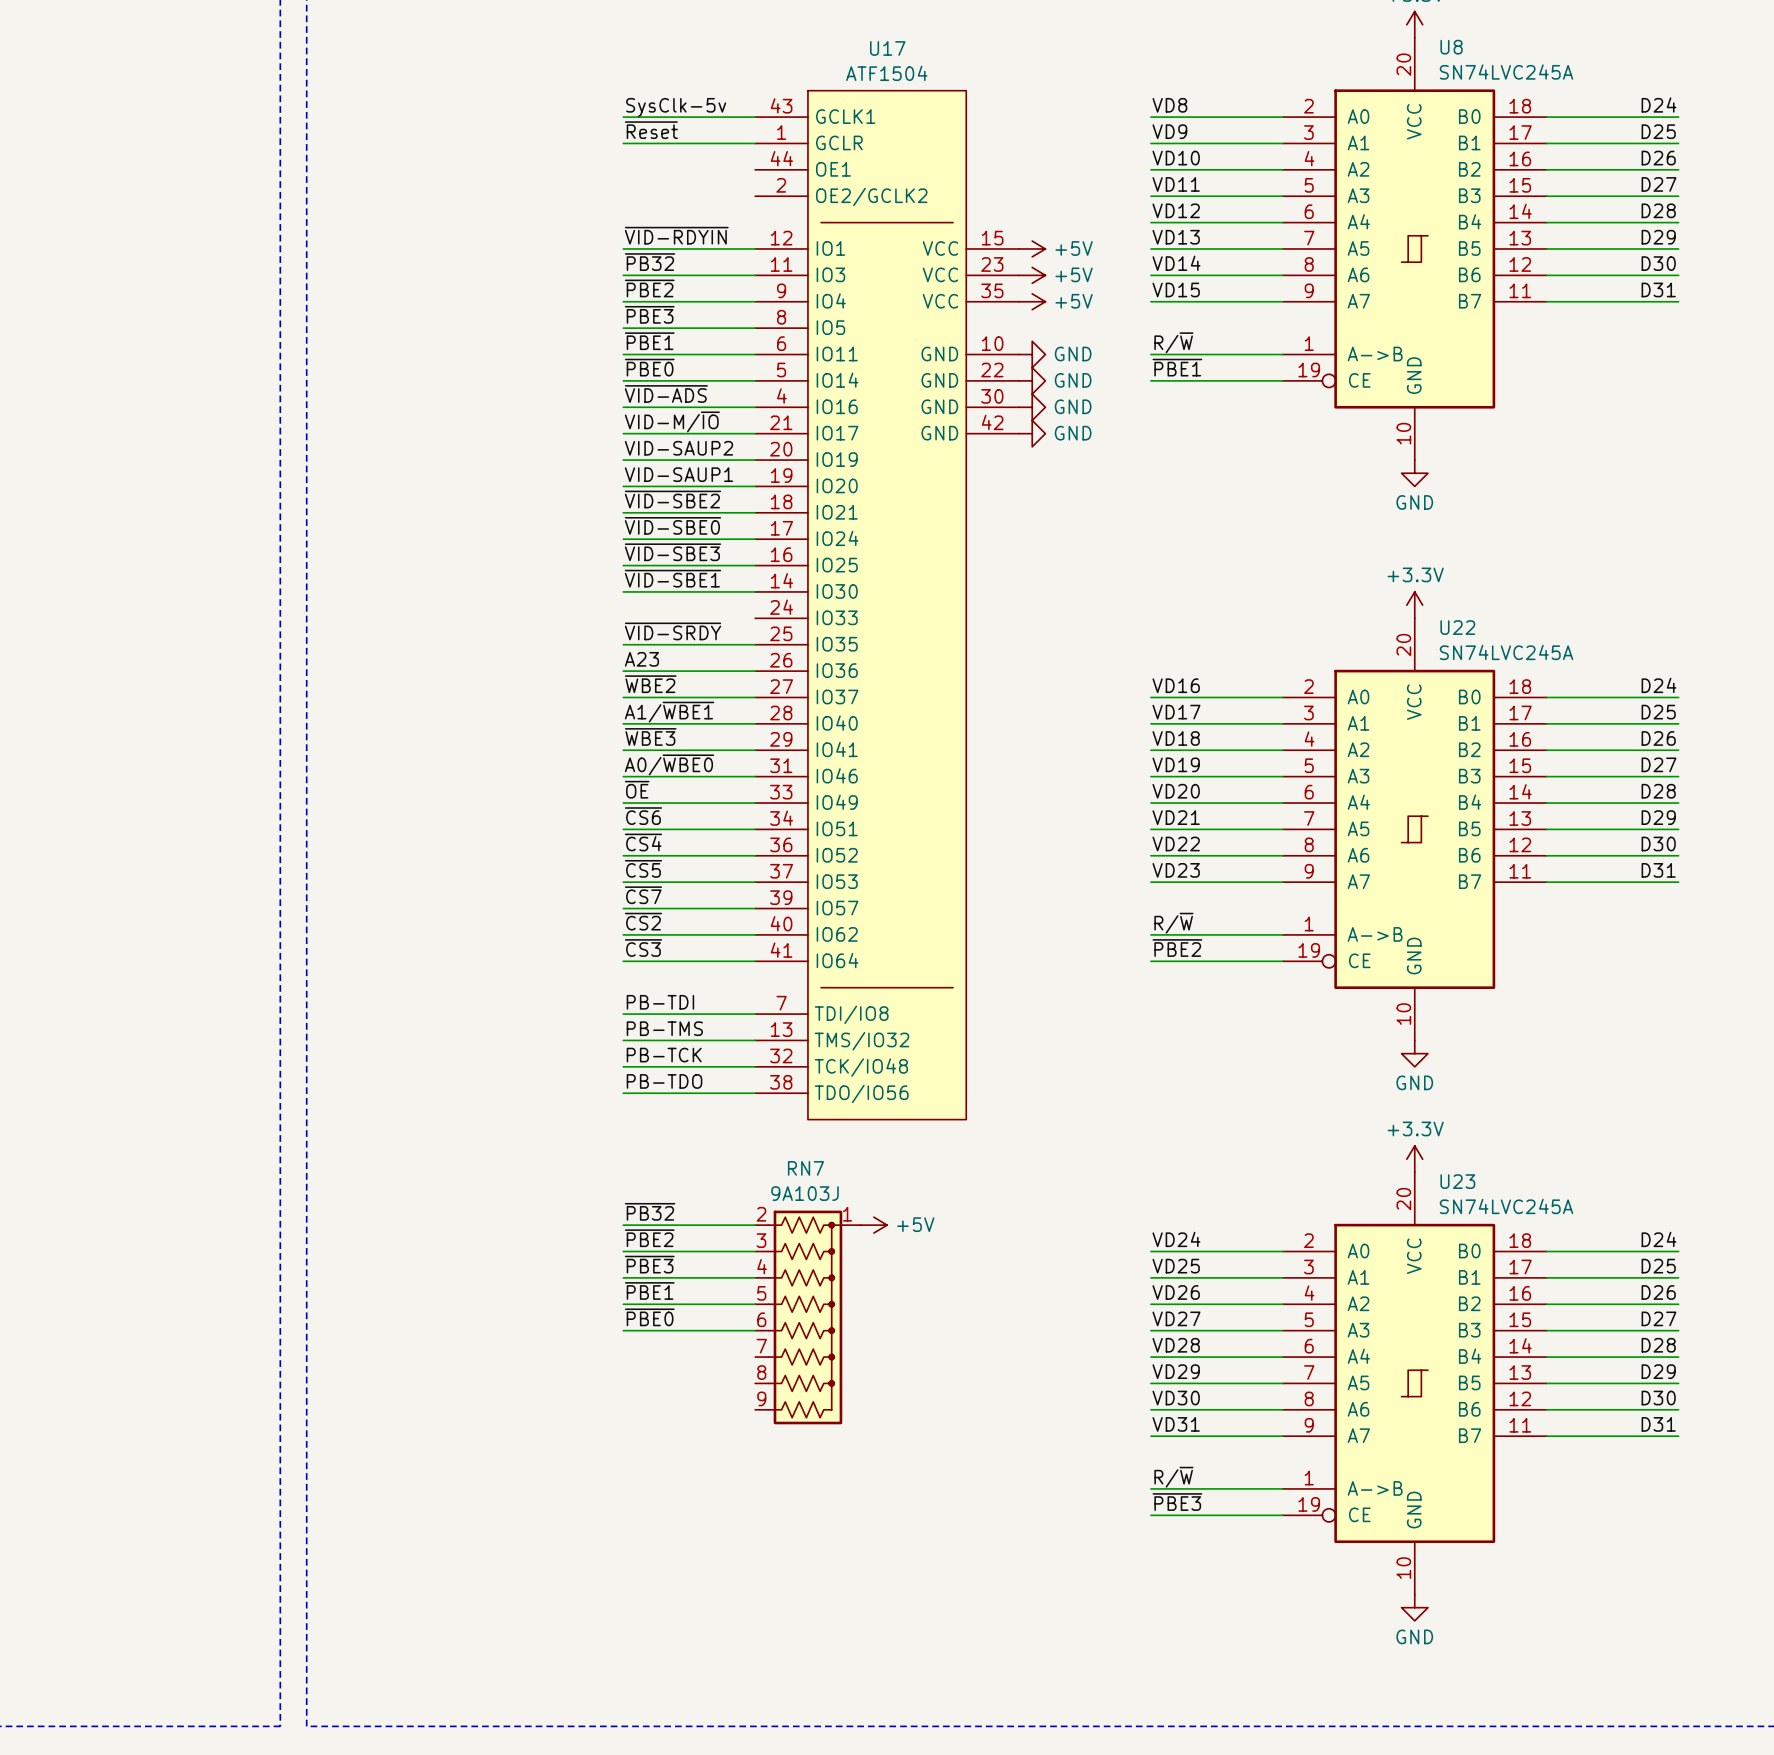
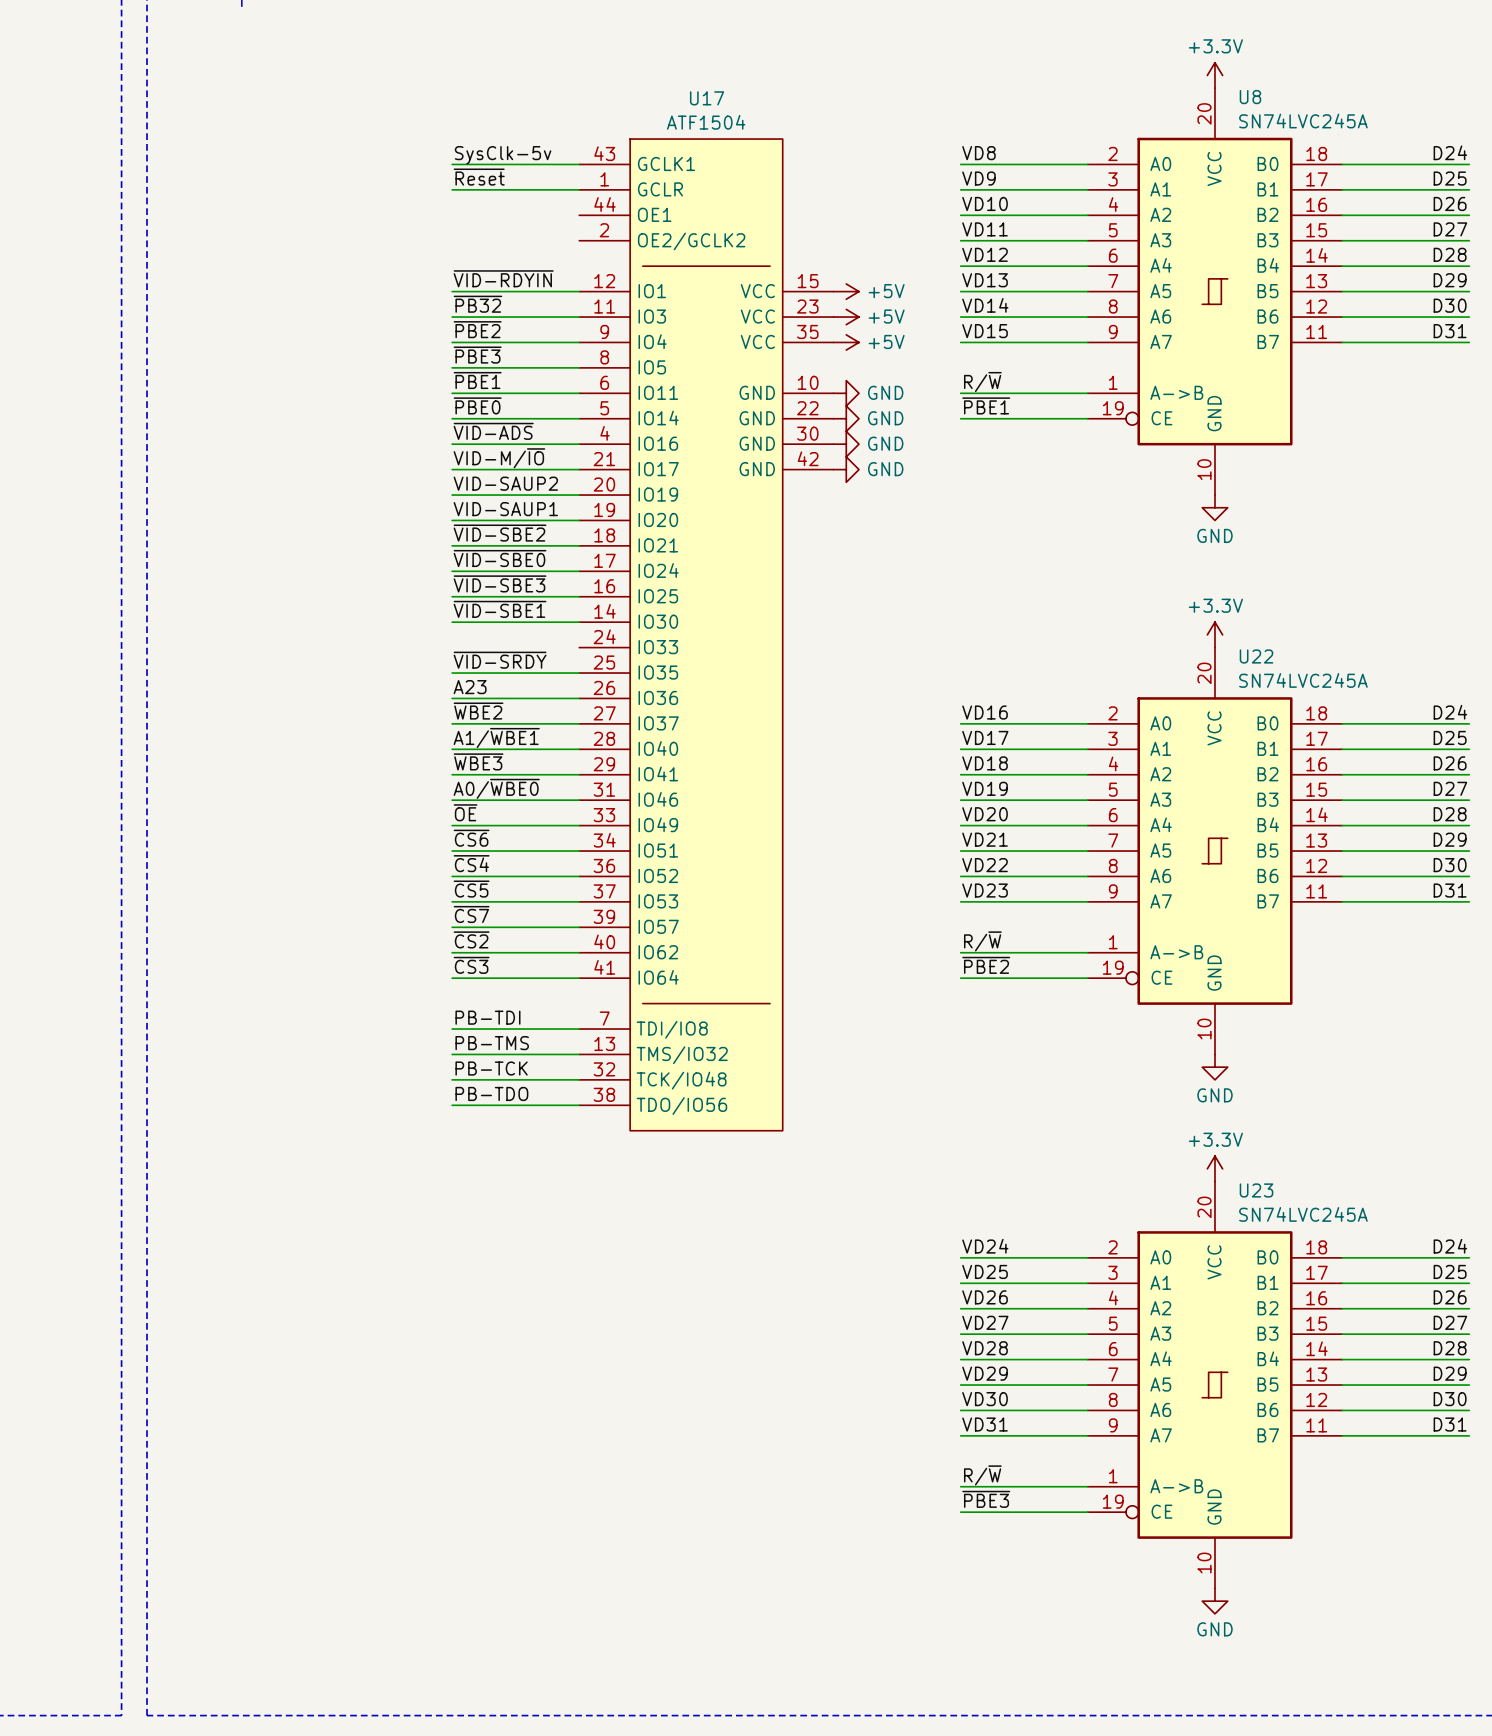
label: ~{PB32} (650, 1211) -> none
wire: (623, 1225) (755, 1225) -> none
power symbol: +5V (873, 1225) -> none
label: ~{PBE2} (649, 1238) -> none
wire: (623, 1251) (755, 1251) -> none
label: ~{PBE3} (649, 1264) -> none
wire: (623, 1277) (755, 1277) -> none
label: ~{PBE1} (649, 1290) -> none
wire: (623, 1304) (755, 1304) -> none
label: ~{PBE0} (649, 1317) -> none
RN7: 9A103J (807, 1317) -> none
wire: (623, 1330) (755, 1330) -> none

